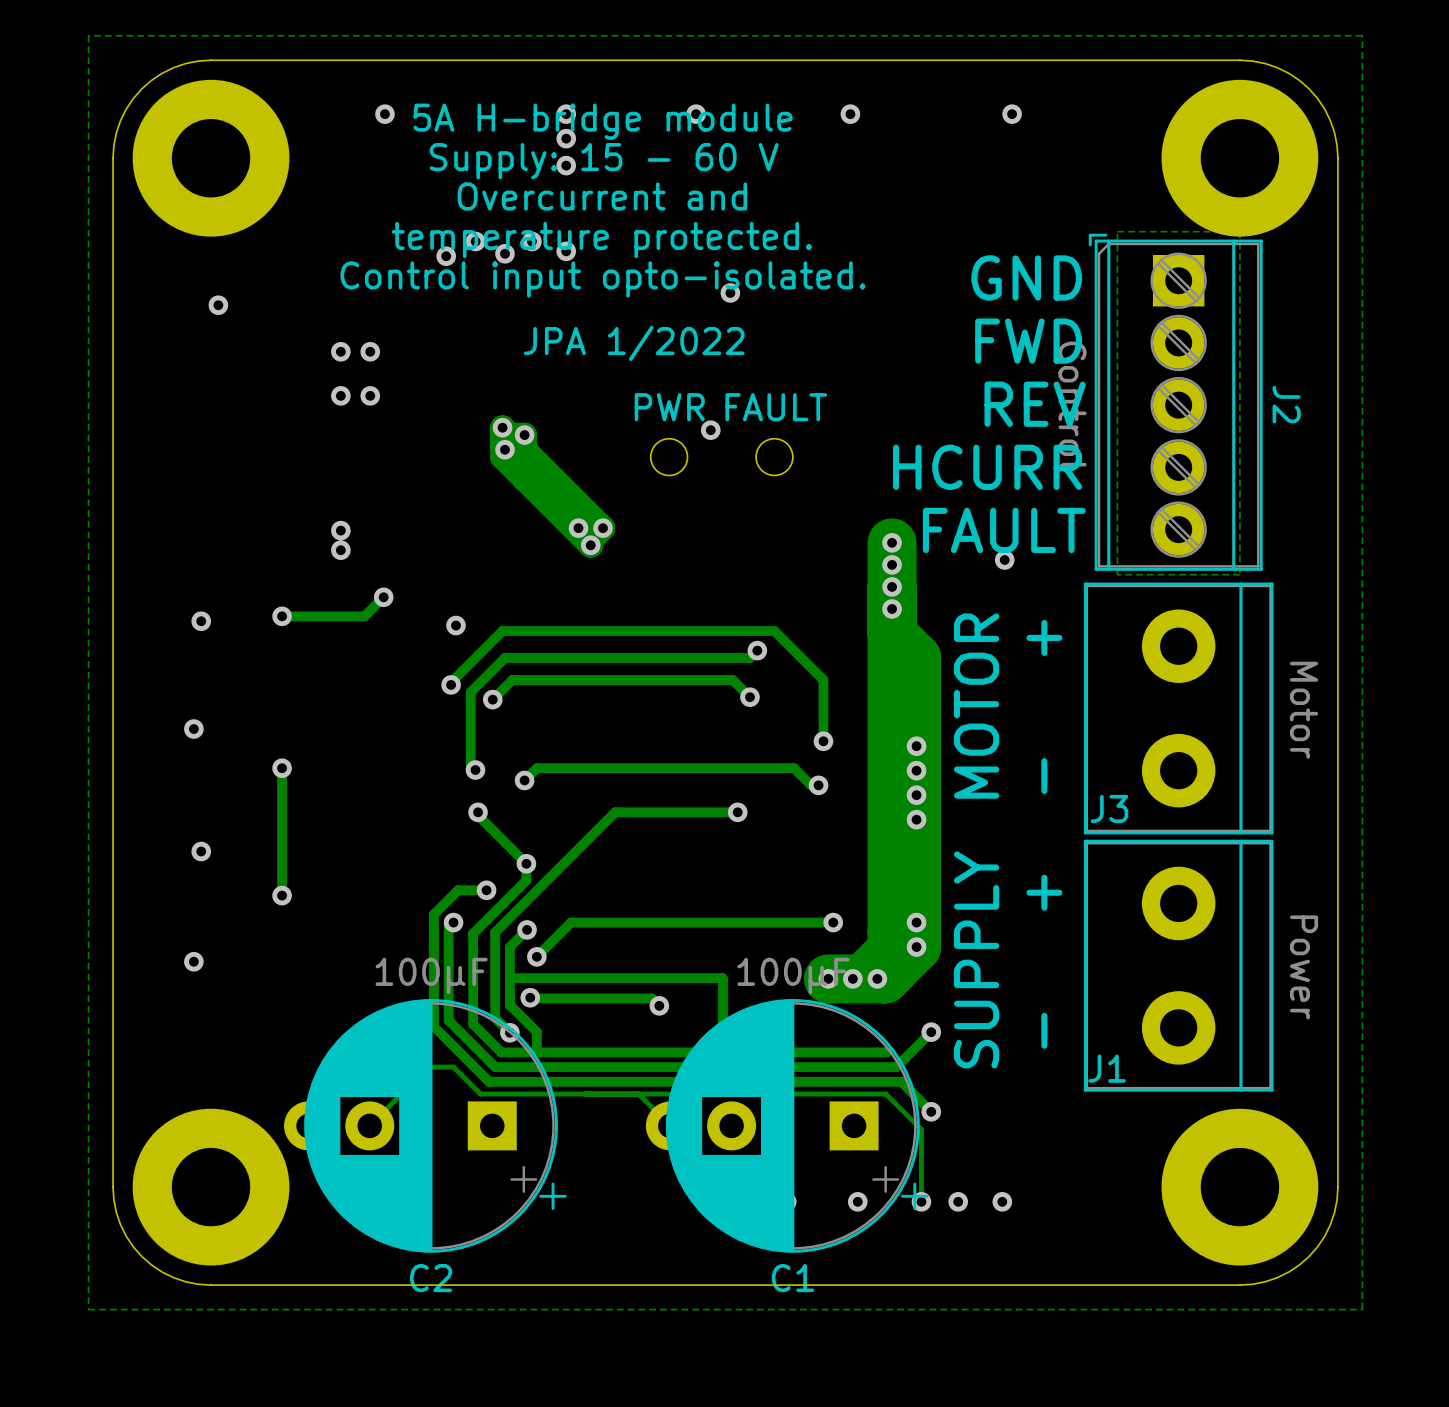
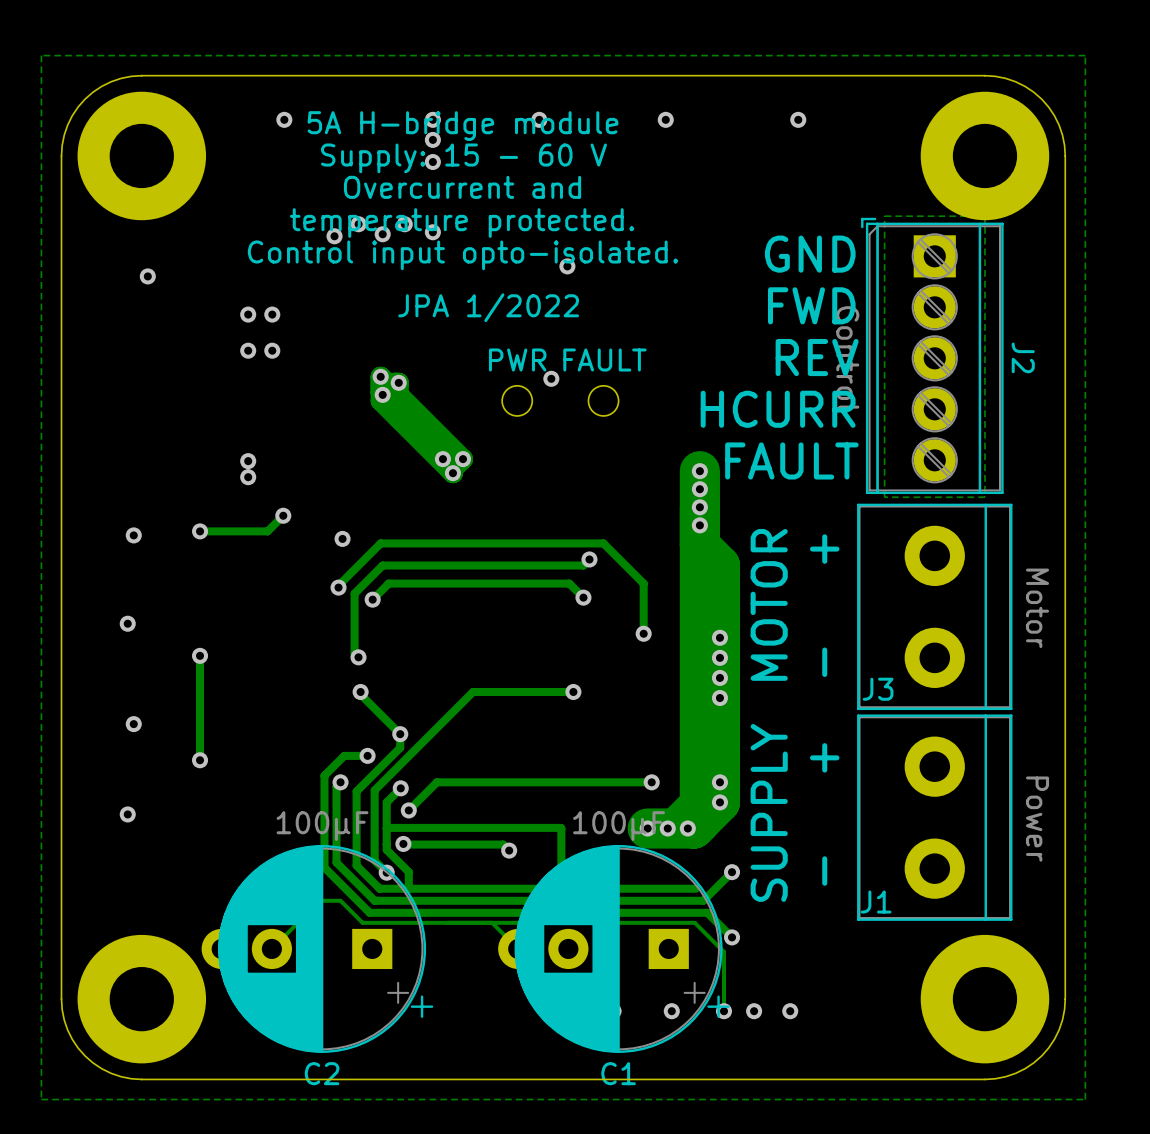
via: (1004, 560) -> none
track: (524, 780) (536, 768) (794, 768) (811, 785) (818, 785) -> none
via: (524, 780) -> none
via: (818, 785) -> none

